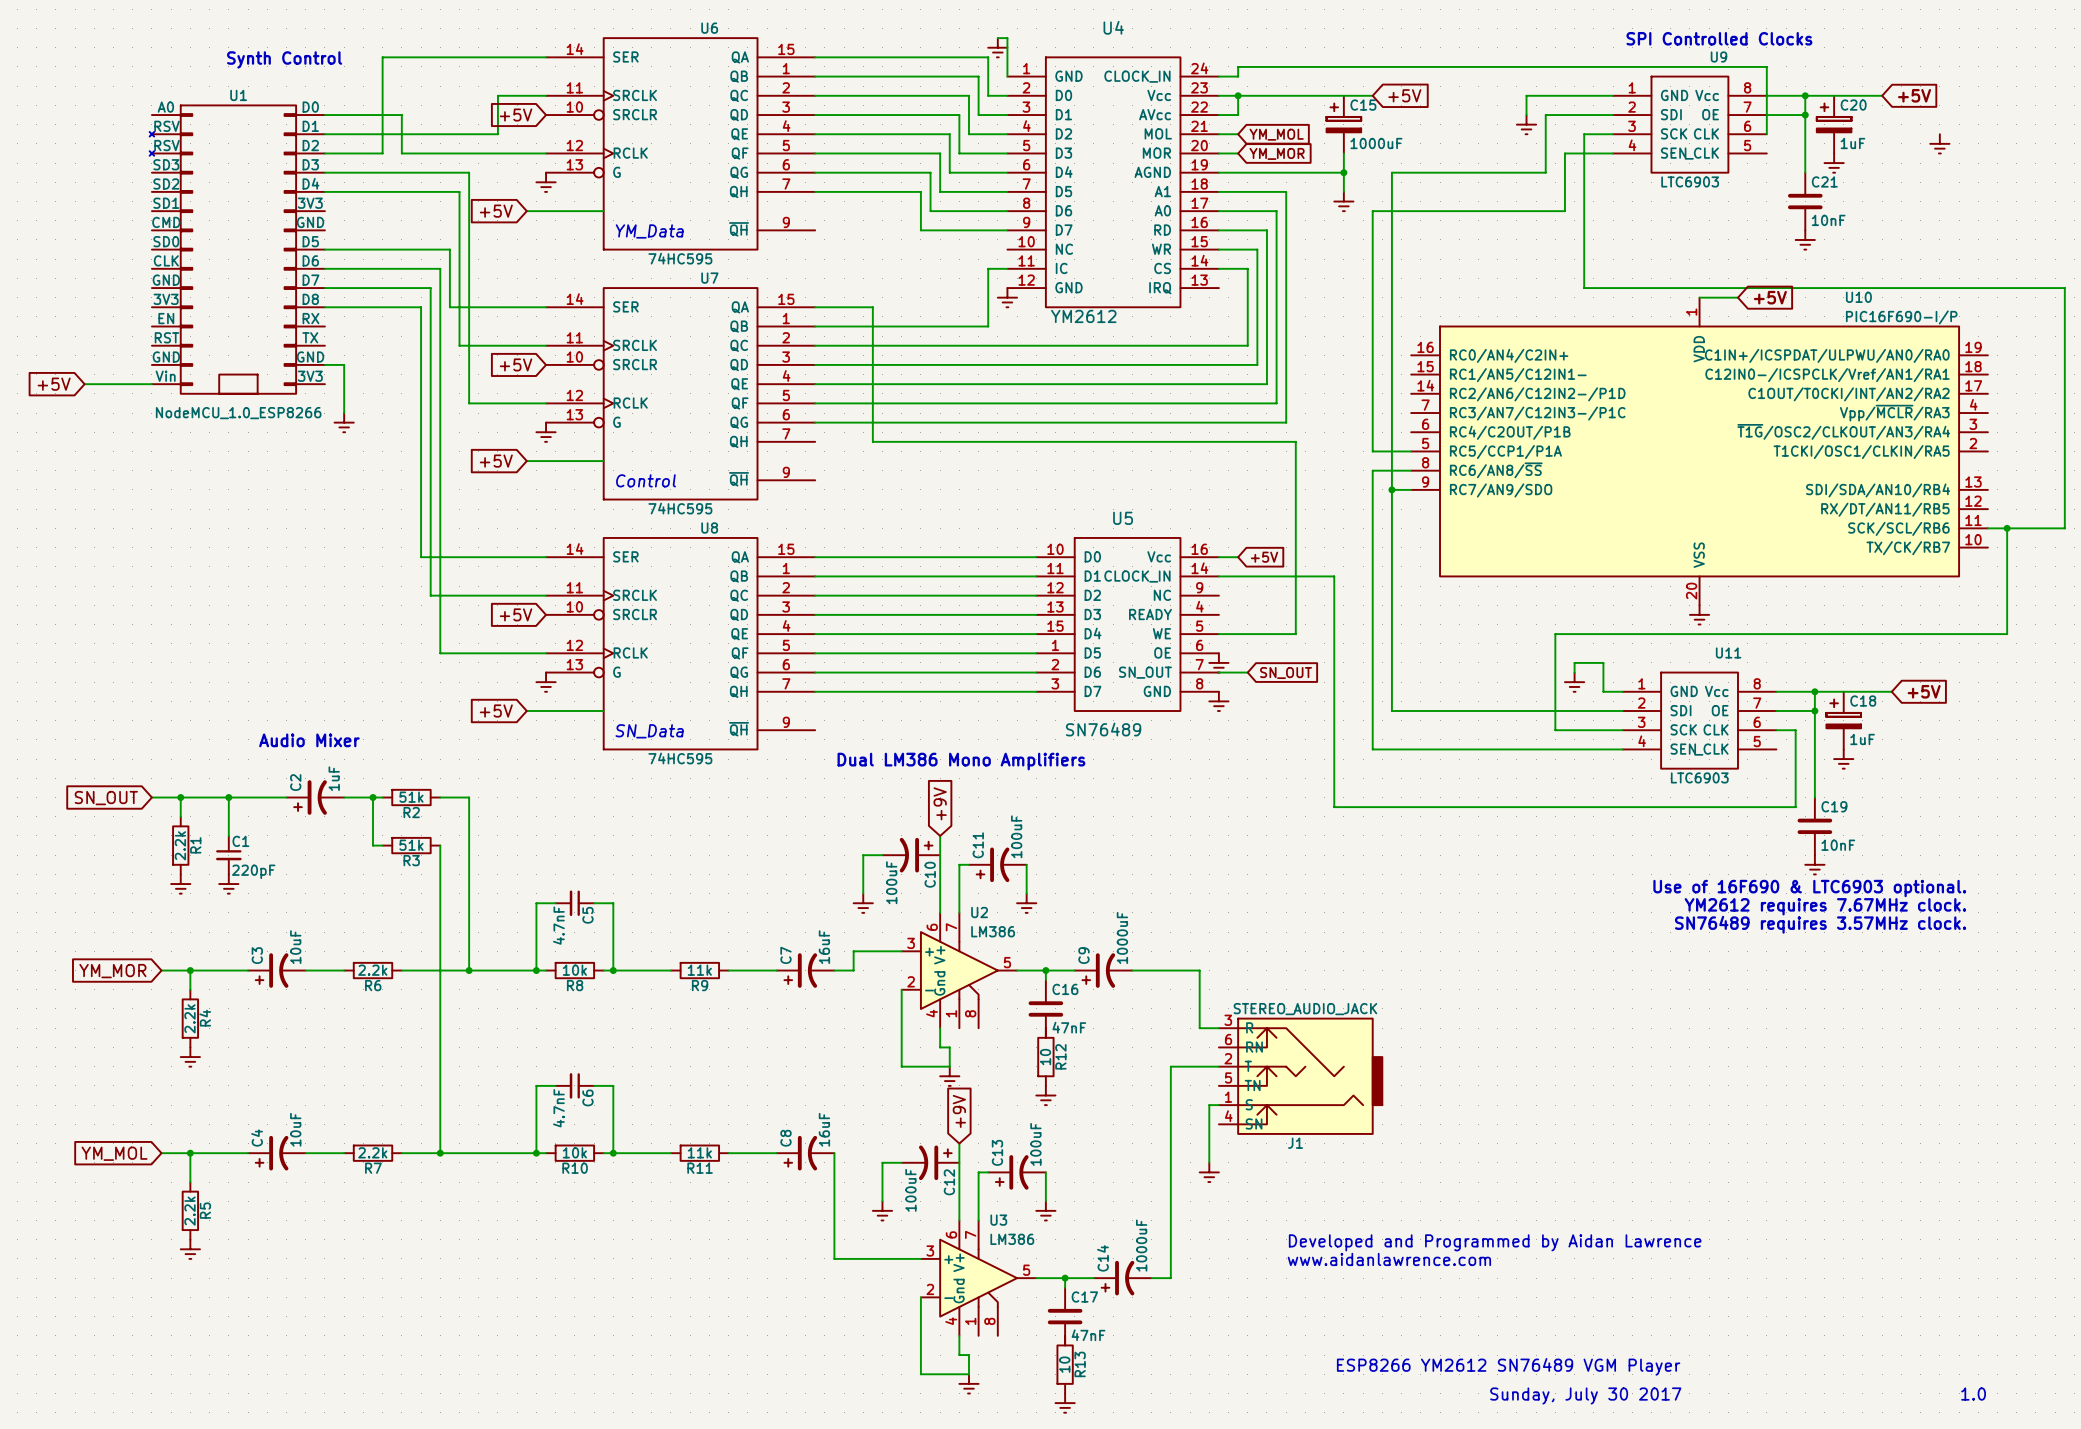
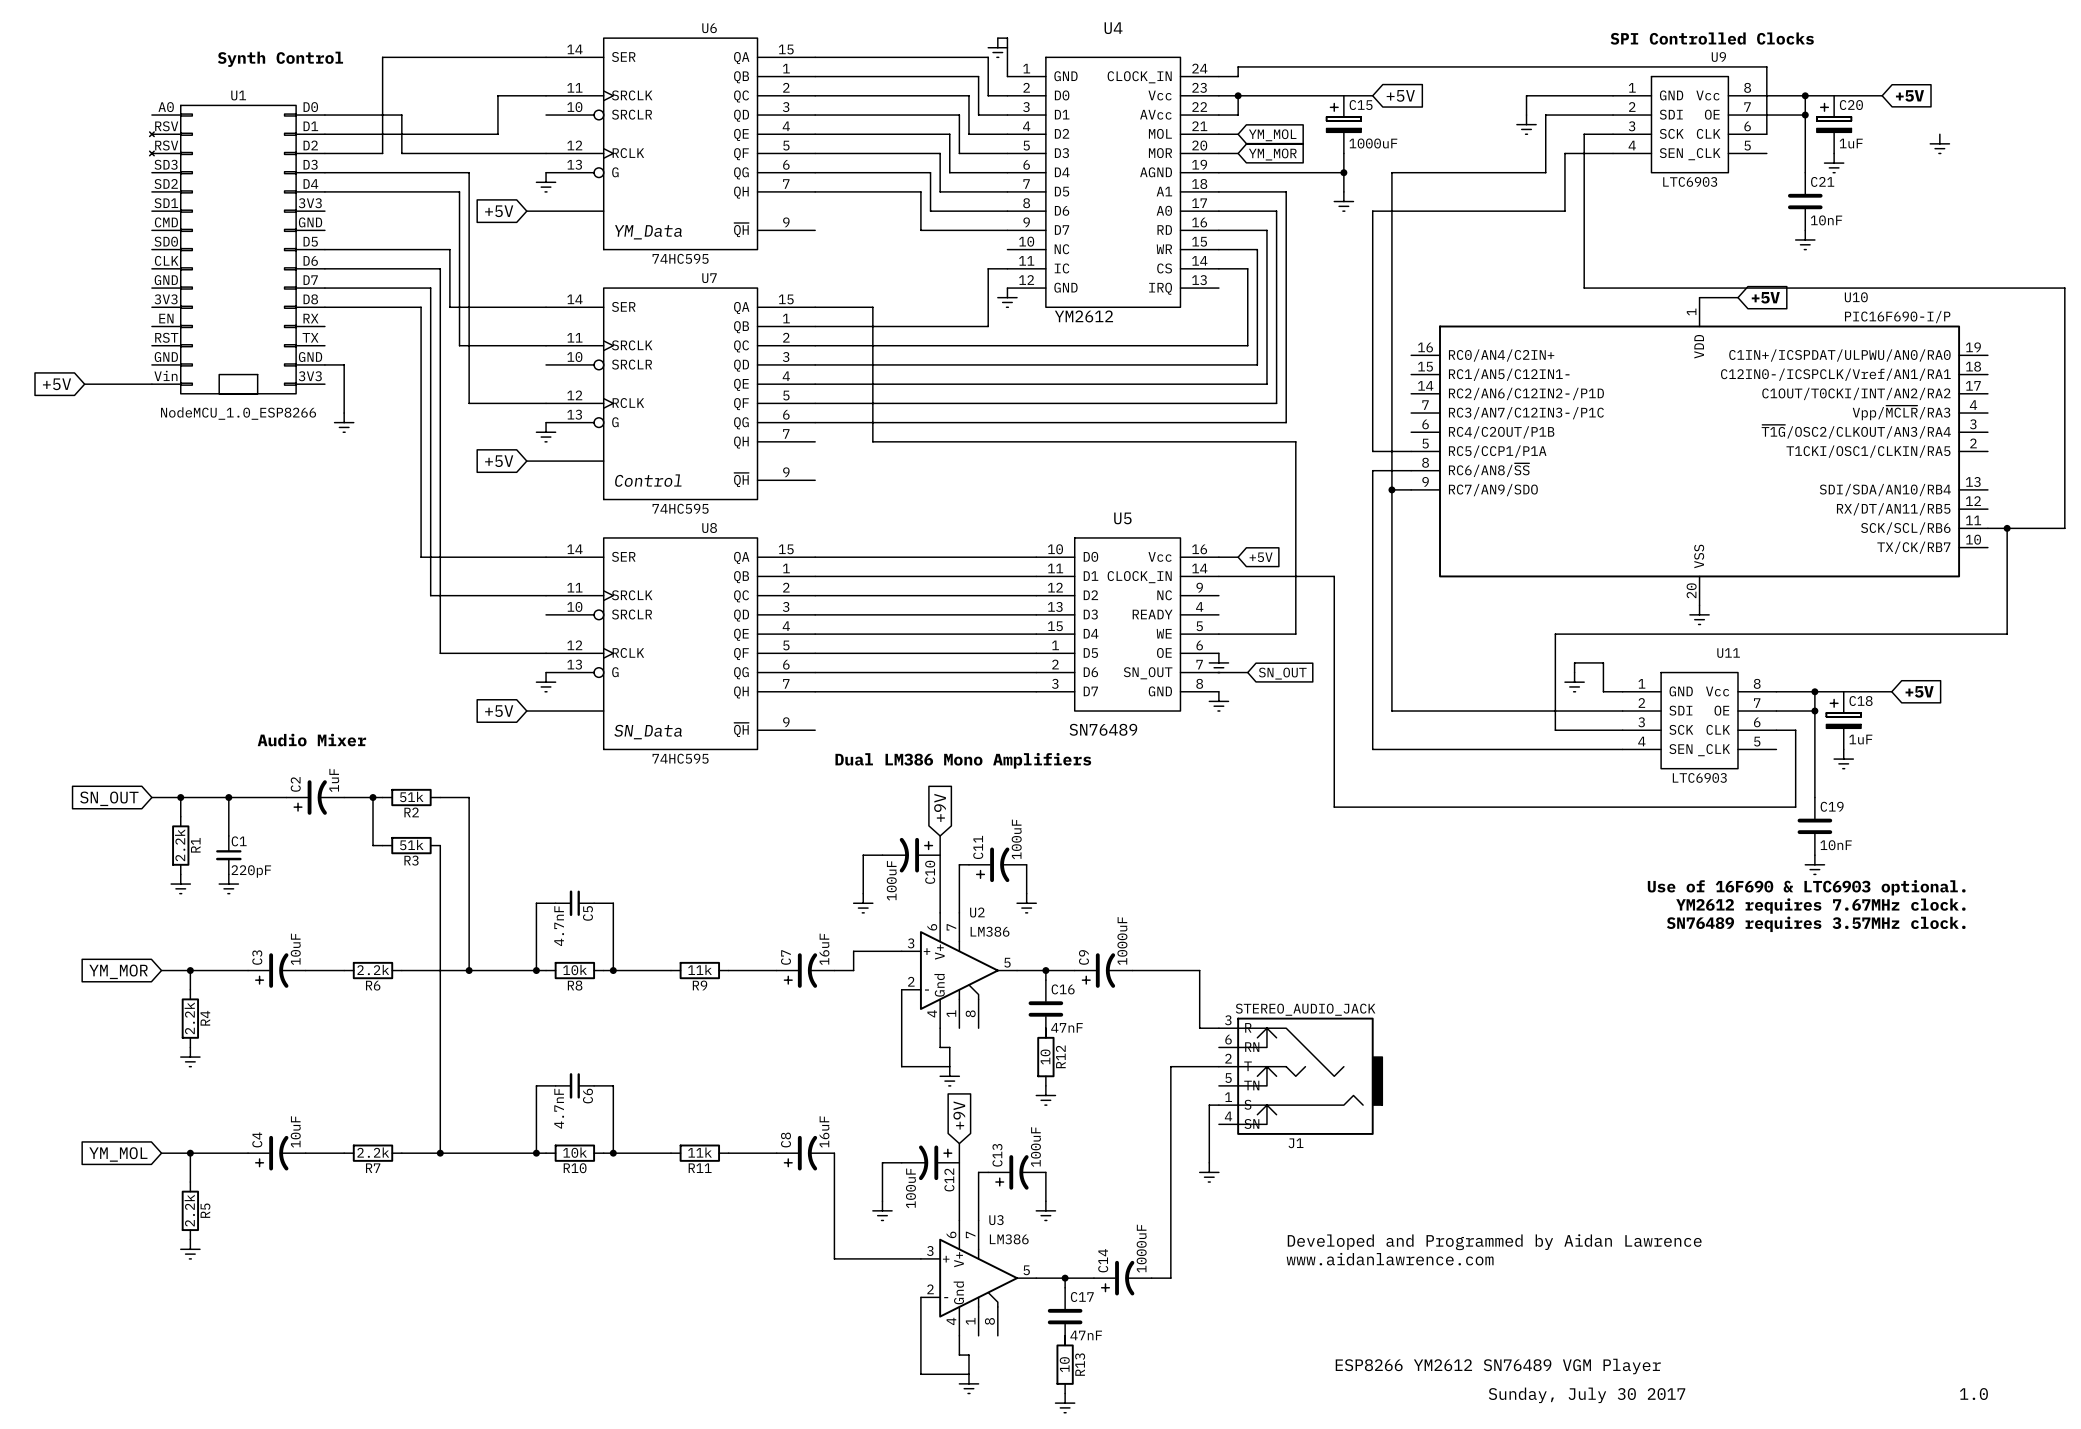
global label: +5V (516, 115) -> none
global label: +5V (516, 364) -> none
global label: +5V (516, 614) -> none

